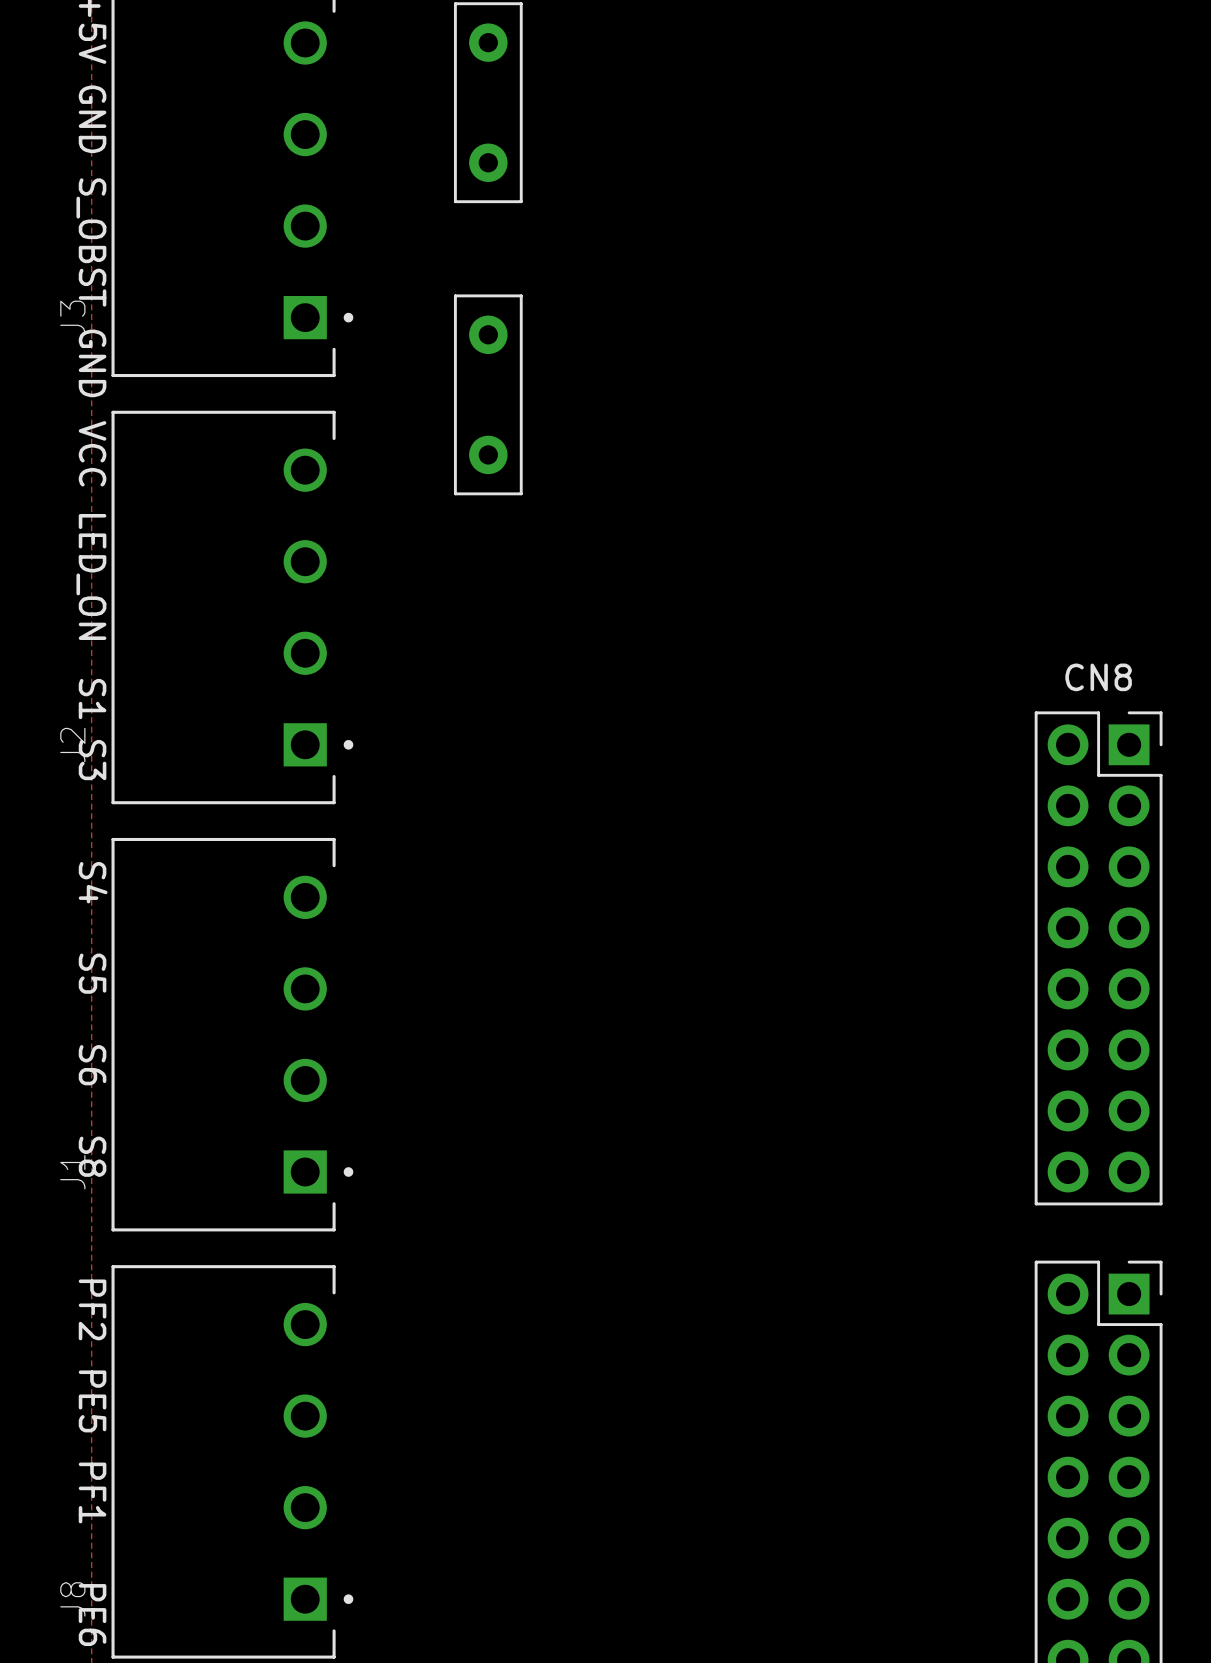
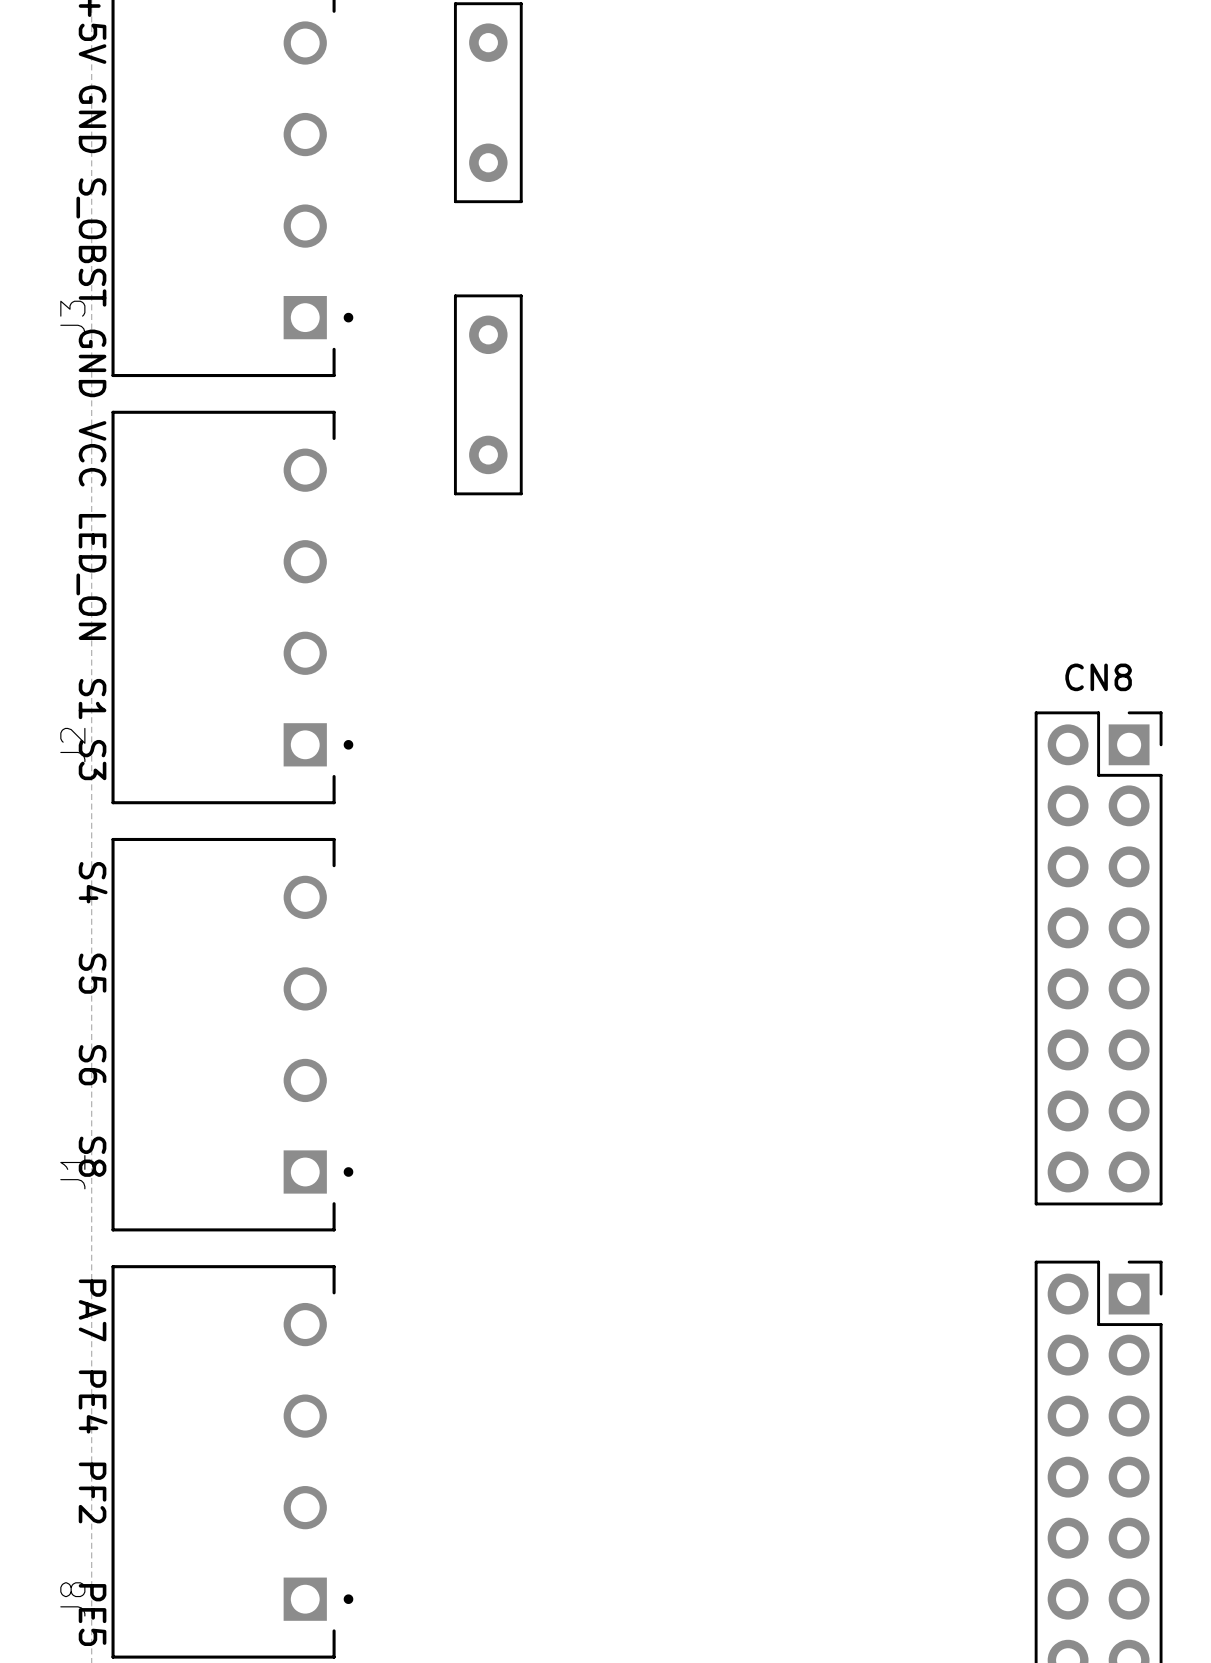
text: PF2 (92, 1309) -> PA7 (92, 1310)
text: PE5 (92, 1401) -> PE4 (93, 1401)
text: PF1 (92, 1492) -> PF2 (92, 1492)
text: PE6 (92, 1615) -> PE5 (92, 1615)

